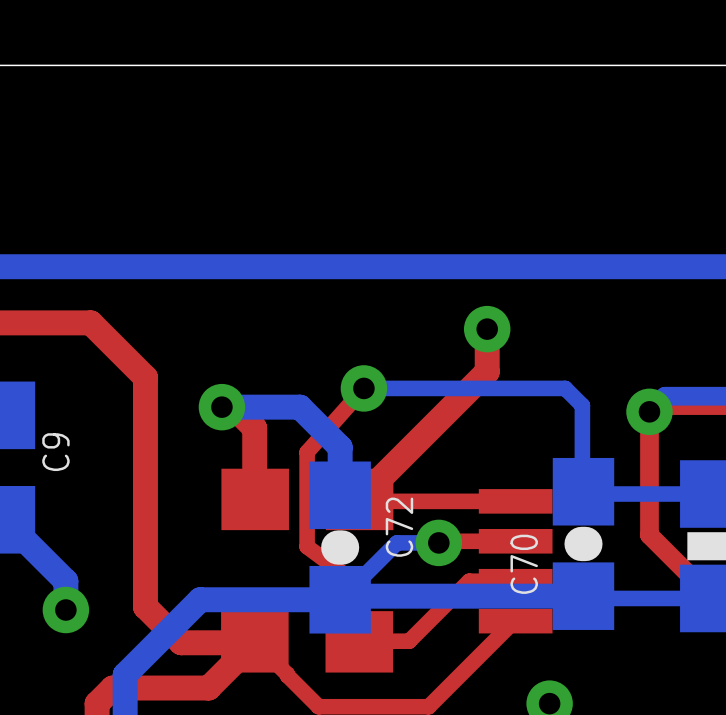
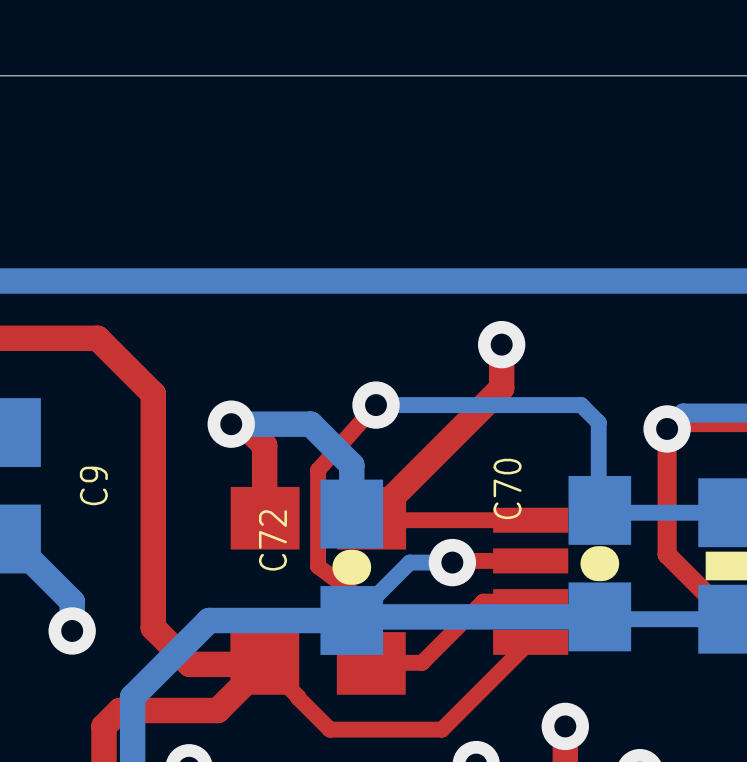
C9 name position: C9 (55, 452) -> C9 (93, 485)
C72 name position: C72 (399, 527) -> C72 (272, 540)
C70 name position: C70 (524, 564) -> C70 (507, 488)

